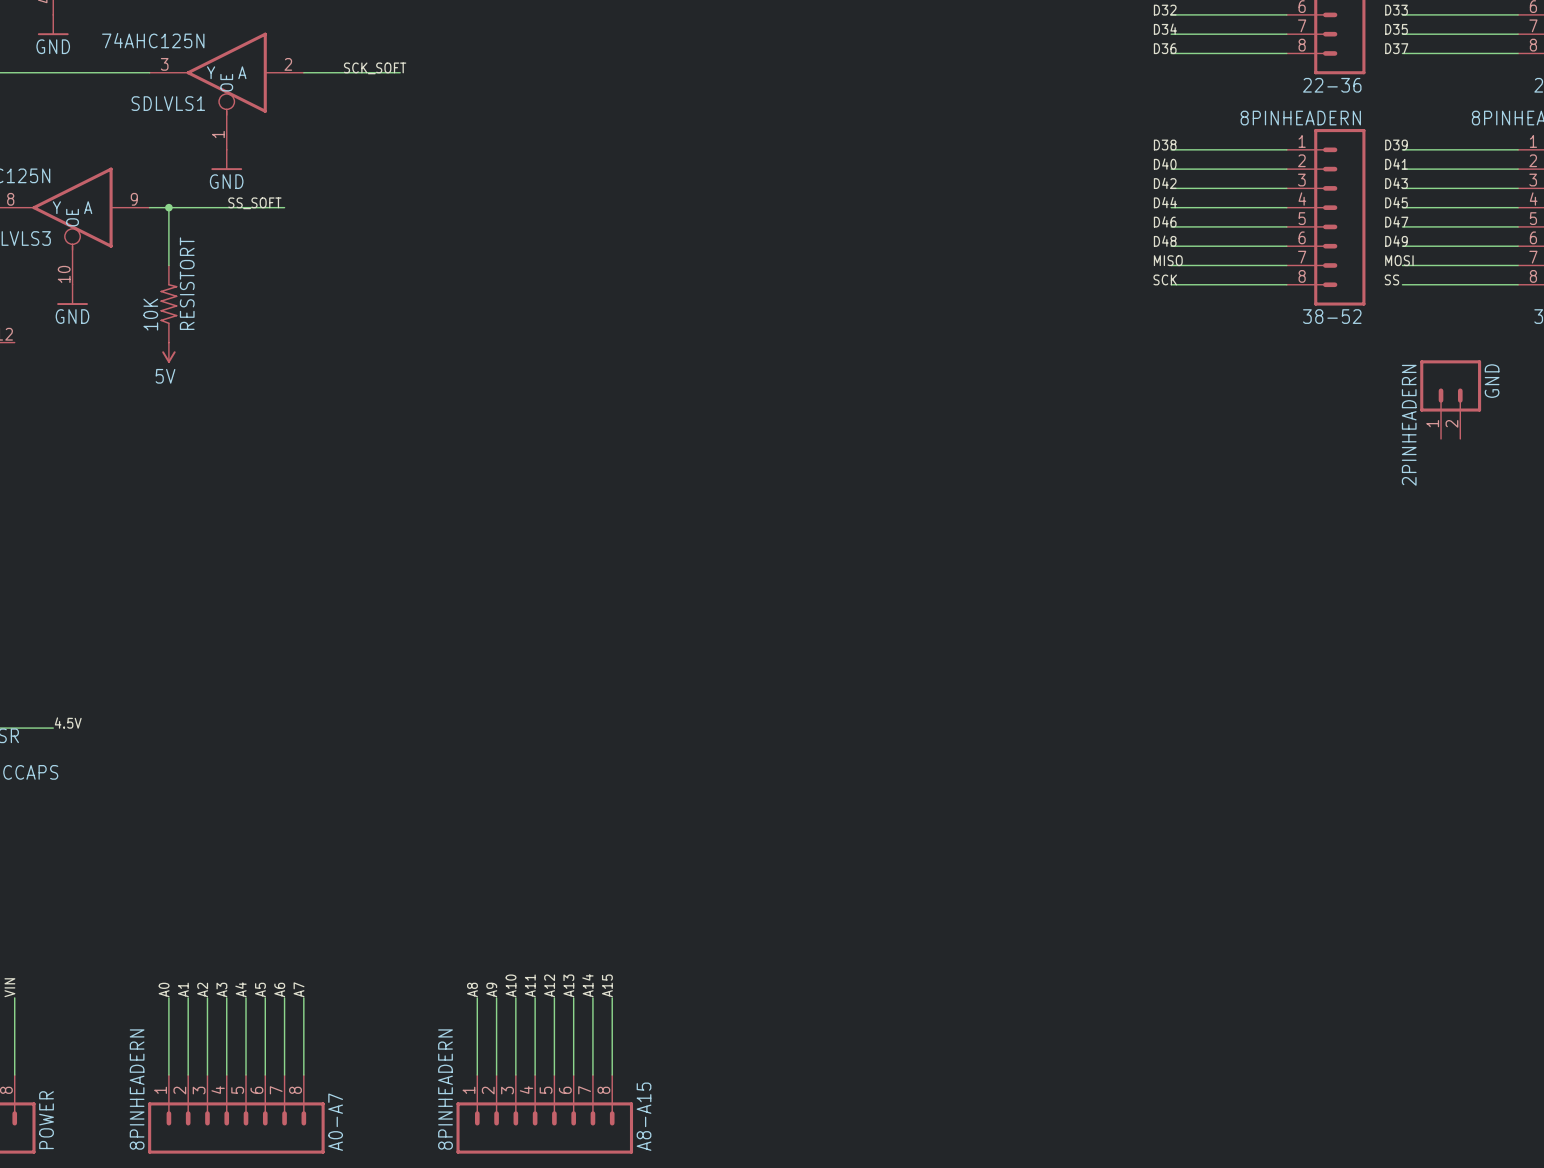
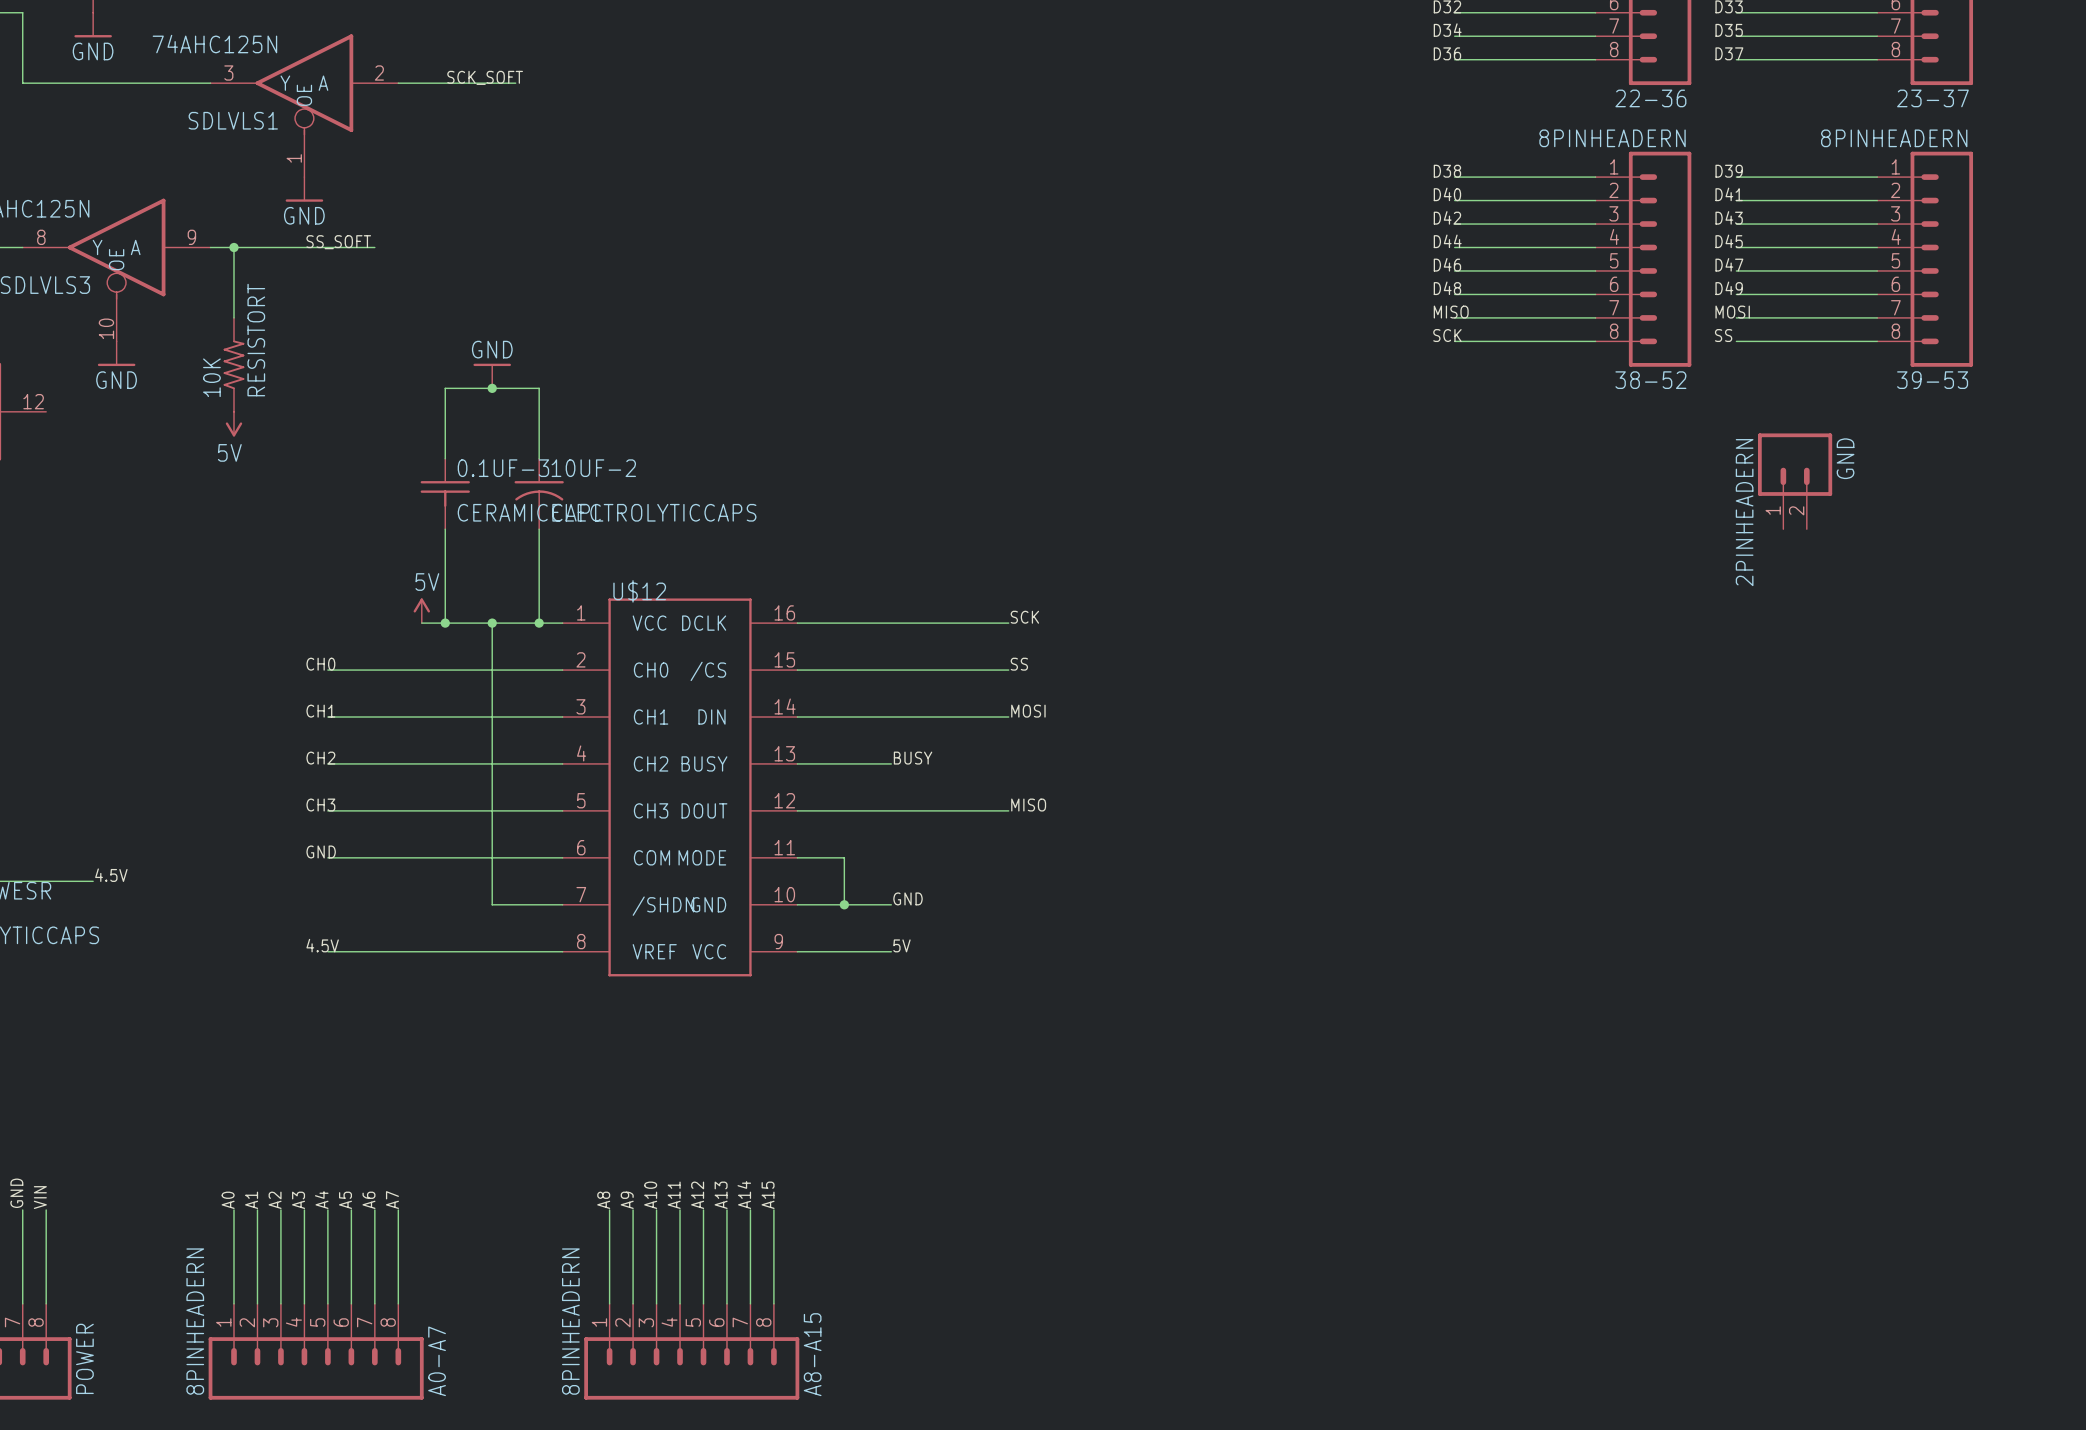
power symbol: none -> GND (492, 376)
junction: none -> (492, 388)
wire: none -> (445, 458) (445, 388) (539, 388) (539, 458)
0.1UF-3: none -> CERAMICCAPL (445, 493)
10UF-2: none -> ELECTROLYTICCAPS (539, 493)
wire: none -> (445, 529) (445, 623)
wire: none -> (539, 529) (539, 623)
power symbol: none -> 5V (421, 610)
label: none -> SCK (1024, 617)
wire: none -> (421, 623) (562, 623)
junction: none -> (445, 623)
wire: none -> (492, 623) (492, 904) (562, 904)
junction: none -> (492, 623)
junction: none -> (539, 623)
wire: none -> (797, 623) (1008, 623)
label: none -> CH0 (320, 664)
label: none -> SS (1019, 664)
wire: none -> (327, 670) (562, 670)
wire: none -> (797, 670) (1008, 670)
label: none -> CH1 (320, 711)
label: none -> MOSI (1028, 711)
wire: none -> (327, 717) (562, 717)
wire: none -> (797, 717) (1008, 717)
label: none -> CH2 (320, 758)
label: none -> BUSY (913, 758)
wire: none -> (327, 763) (562, 763)
wire: none -> (797, 763) (891, 763)
U$12: none -> (680, 787)
label: none -> CH3 (320, 805)
label: none -> MISO (1028, 805)
wire: none -> (327, 810) (562, 810)
wire: none -> (797, 810) (1008, 810)
label: none -> GND (321, 851)
wire: none -> (327, 857) (562, 857)
wire: none -> (797, 857) (844, 857) (844, 904)
label: none -> GND (908, 898)
wire: none -> (797, 904) (891, 904)
junction: none -> (844, 904)
label: none -> 4.5V (322, 945)
label: none -> 5V (901, 945)
wire: none -> (327, 951) (562, 951)
wire: none -> (797, 951) (891, 951)

